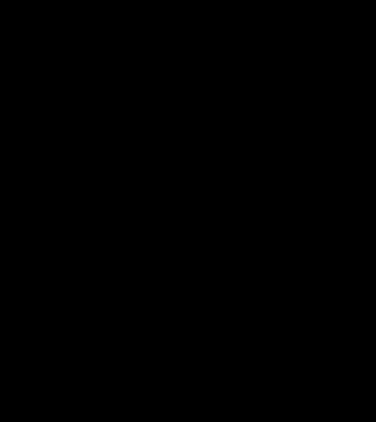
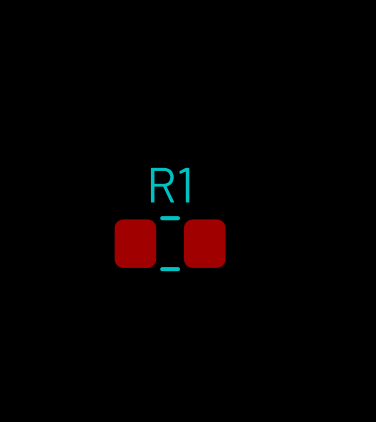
R1: none -> (170, 243)

